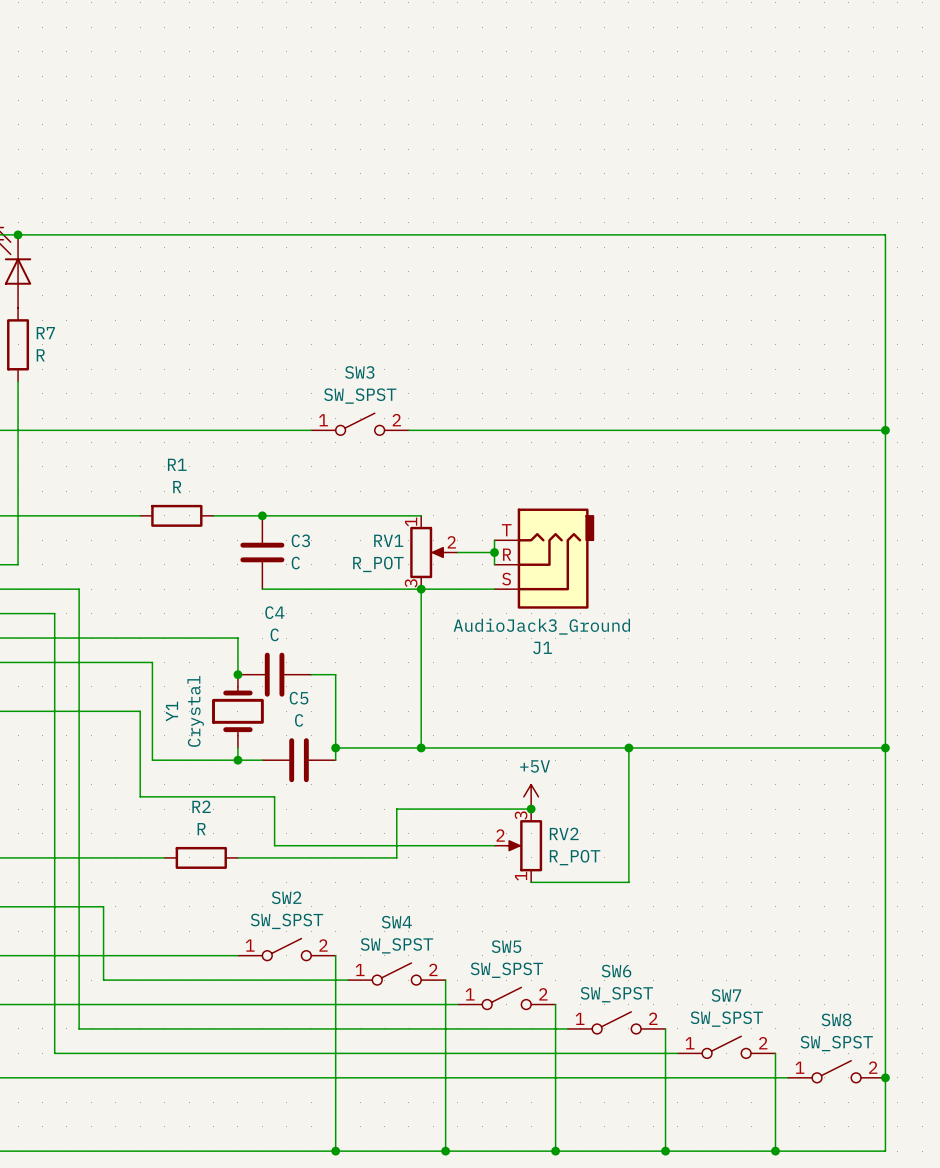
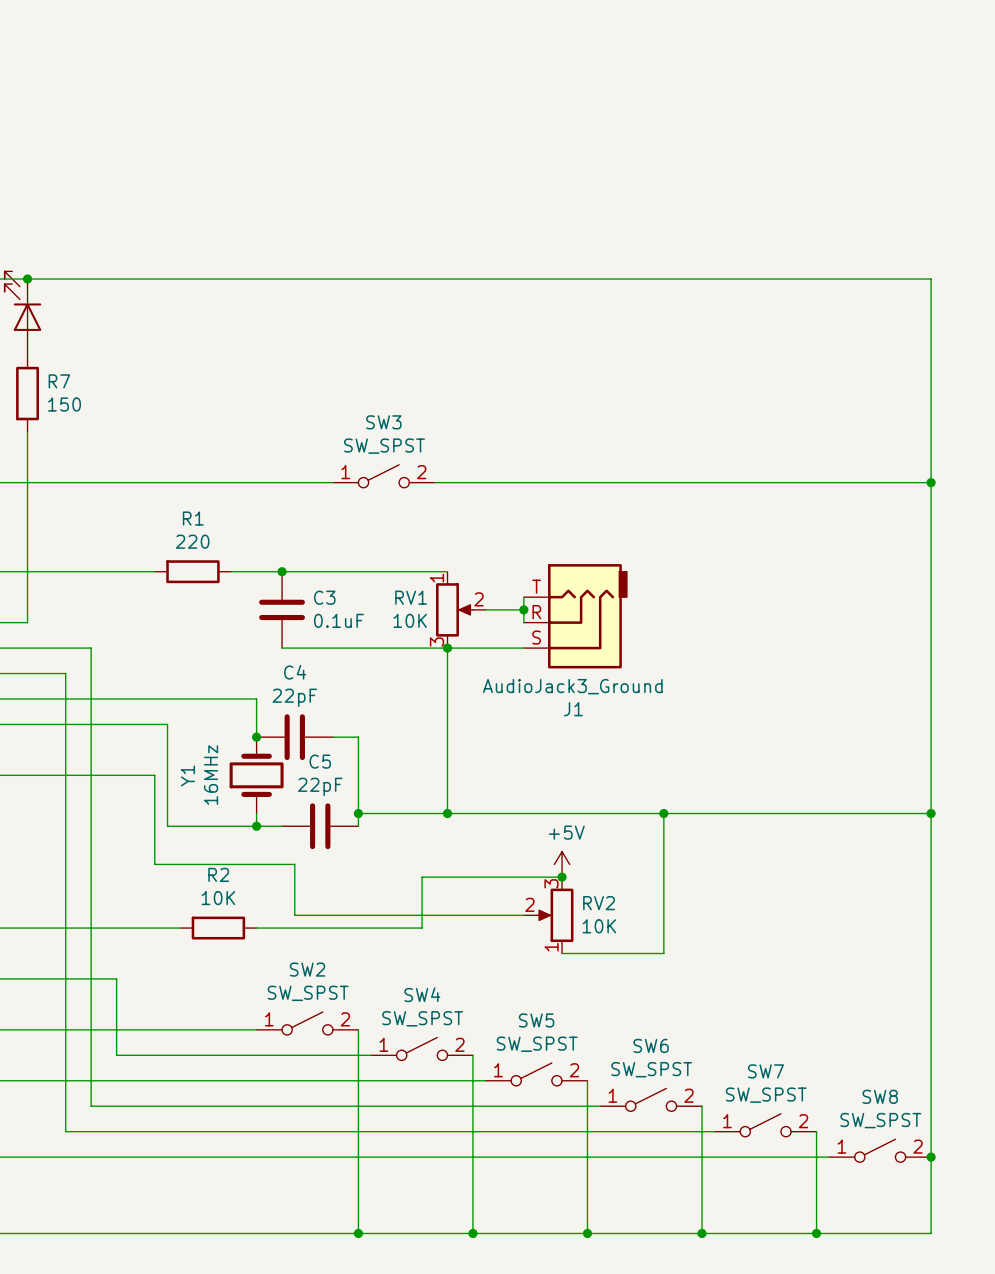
R7 value: R (40, 355) -> 150 (64, 404)
R1 value: R (177, 487) -> 220 (192, 541)
C3 value: C (295, 563) -> 0.1uF (338, 620)
RV1 value: R_POT (378, 564) -> 10K (410, 620)
C4 value: C (274, 634) -> 22pF (294, 697)
Y1 value: Crystal (195, 711) -> 16MHz (211, 775)
C5 value: C (299, 720) -> 22pF (320, 786)
R2 value: R (201, 829) -> 10K (218, 898)
RV2 value: R_POT (575, 857) -> 10K (599, 926)

